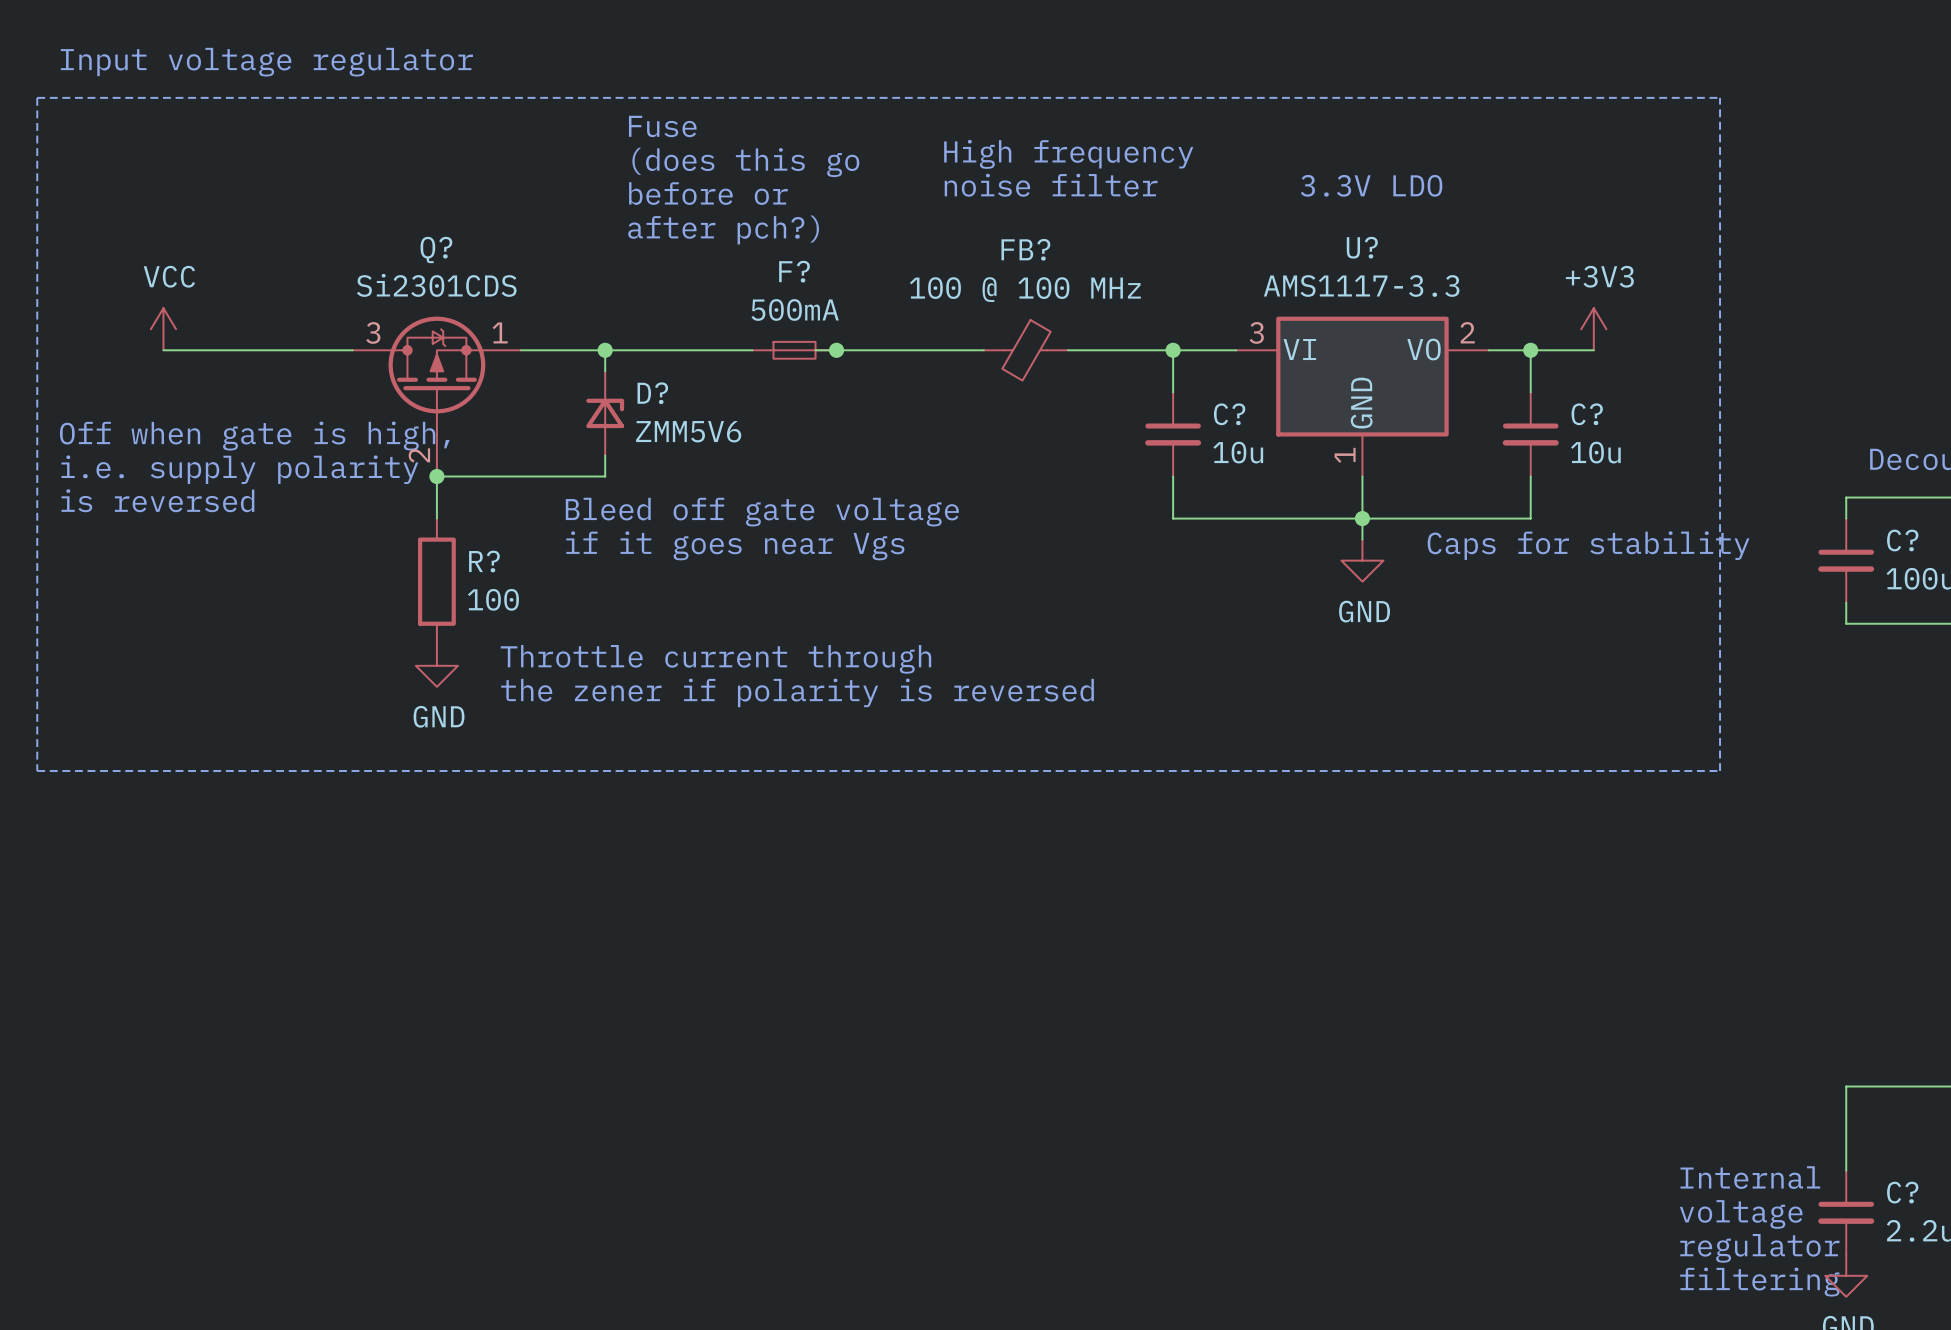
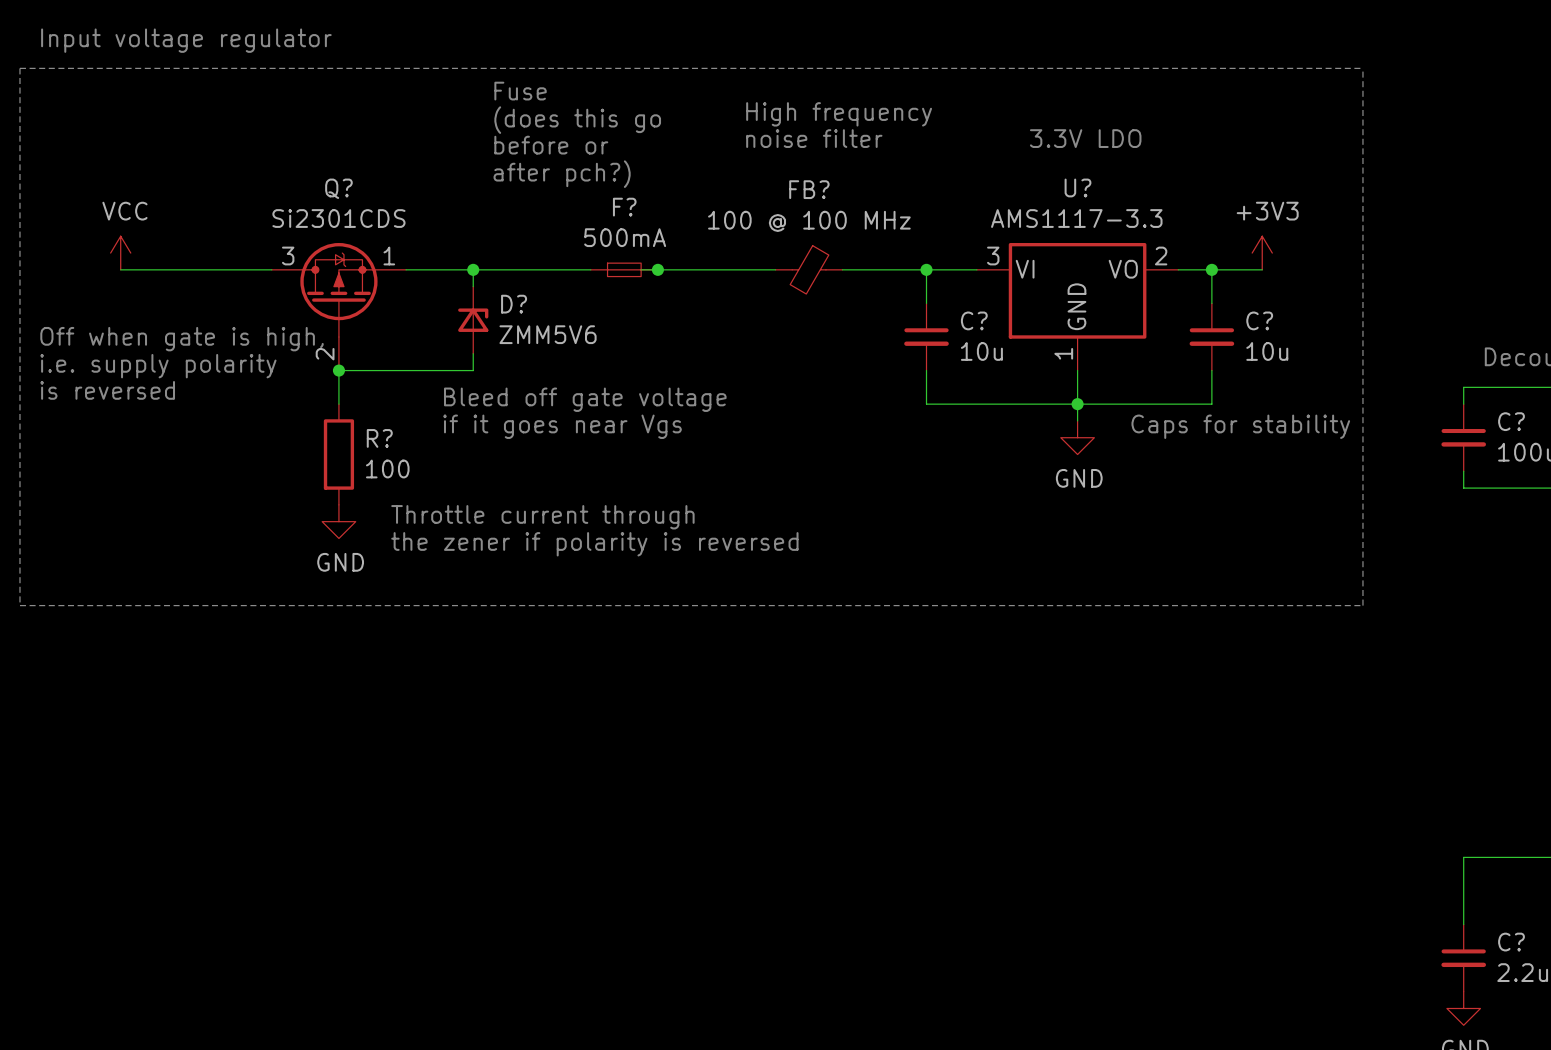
text: Internal (1750, 1177) -> none
text: voltage (1741, 1214) -> none
text: regulator (1759, 1248) -> none
text: filtering (1759, 1282) -> none

